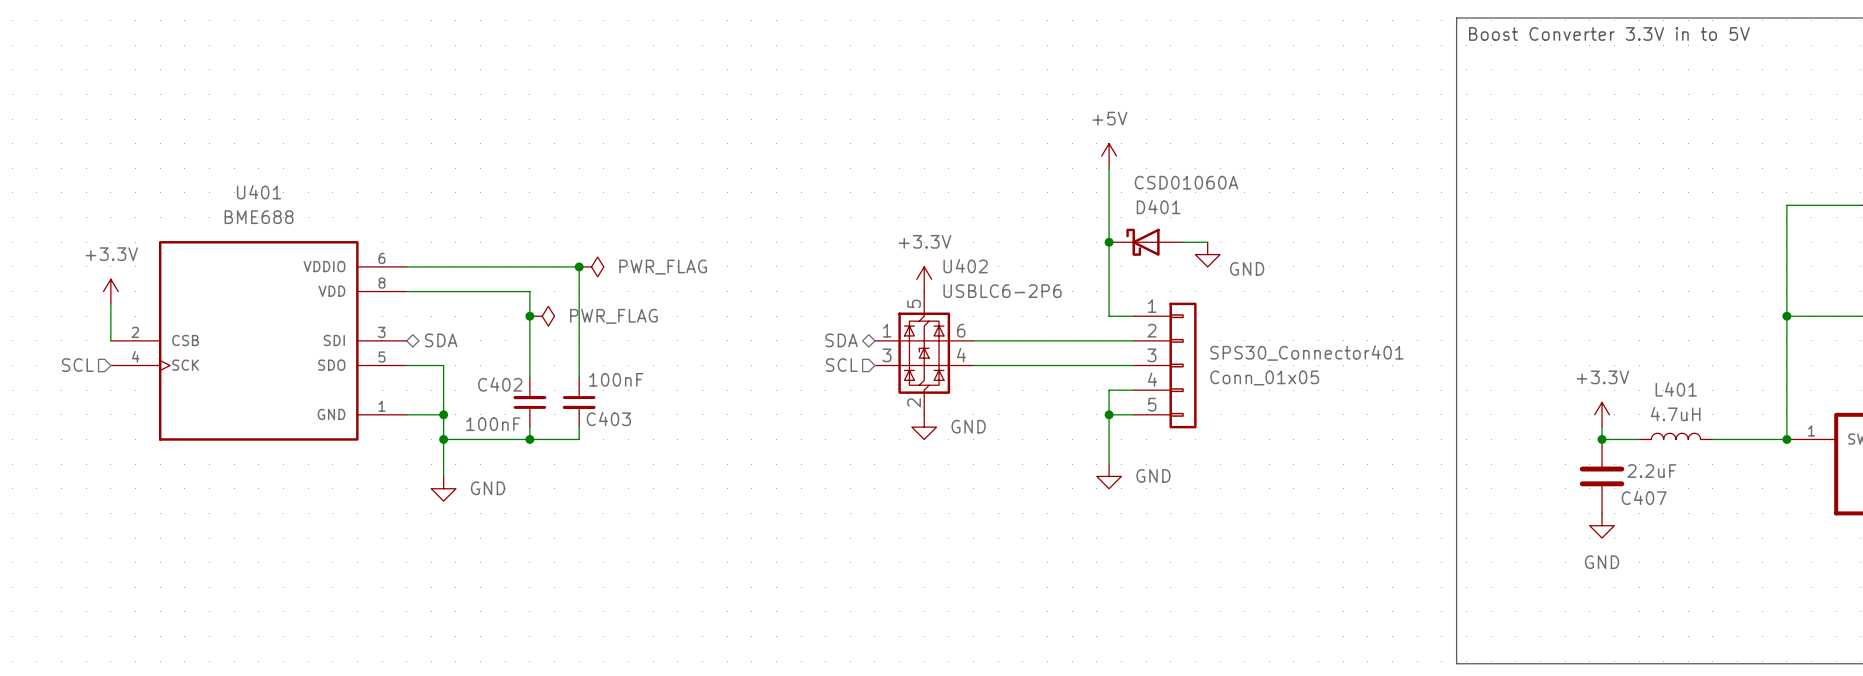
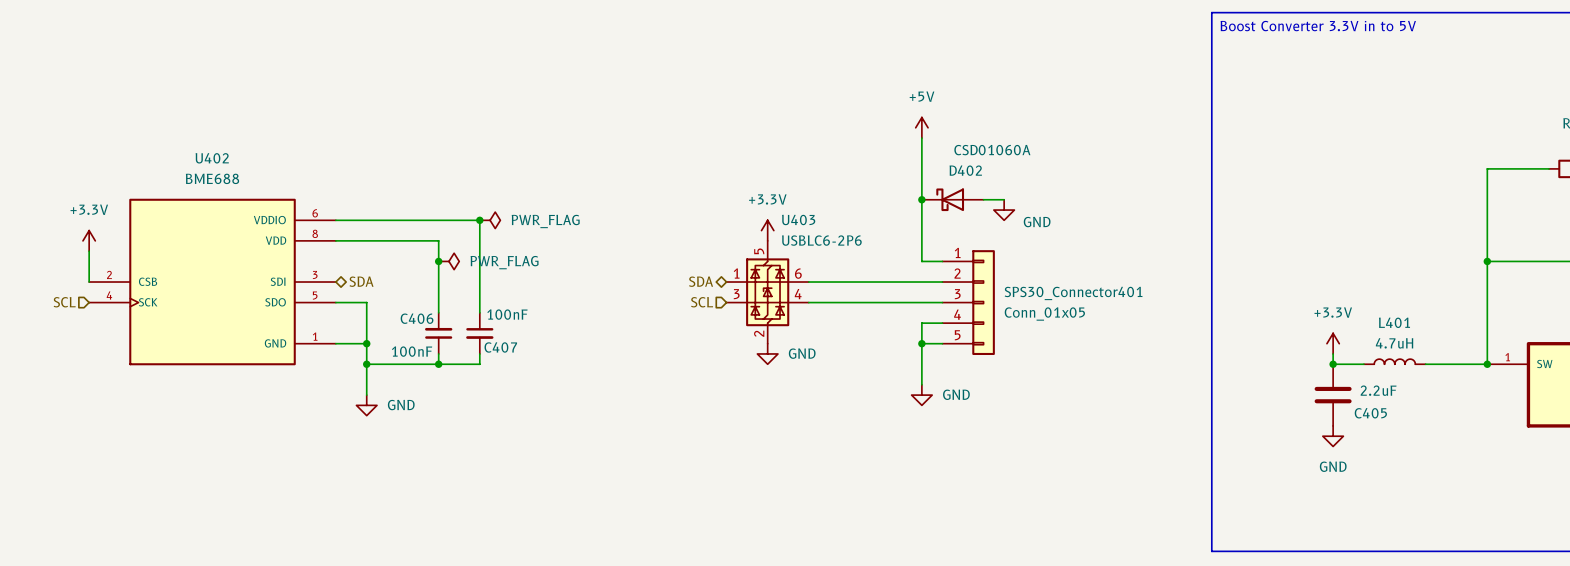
U401 name: U401 (259, 192) -> U402 (212, 158)
D401 name: D401 (1158, 207) -> D402 (965, 170)
U402 name: U402 (965, 266) -> U403 (798, 219)
C402 name: C402 (500, 384) -> C406 (417, 318)
C403 name: C403 (608, 418) -> C407 (500, 347)
C407 name: C407 (1644, 497) -> C405 (1370, 413)

